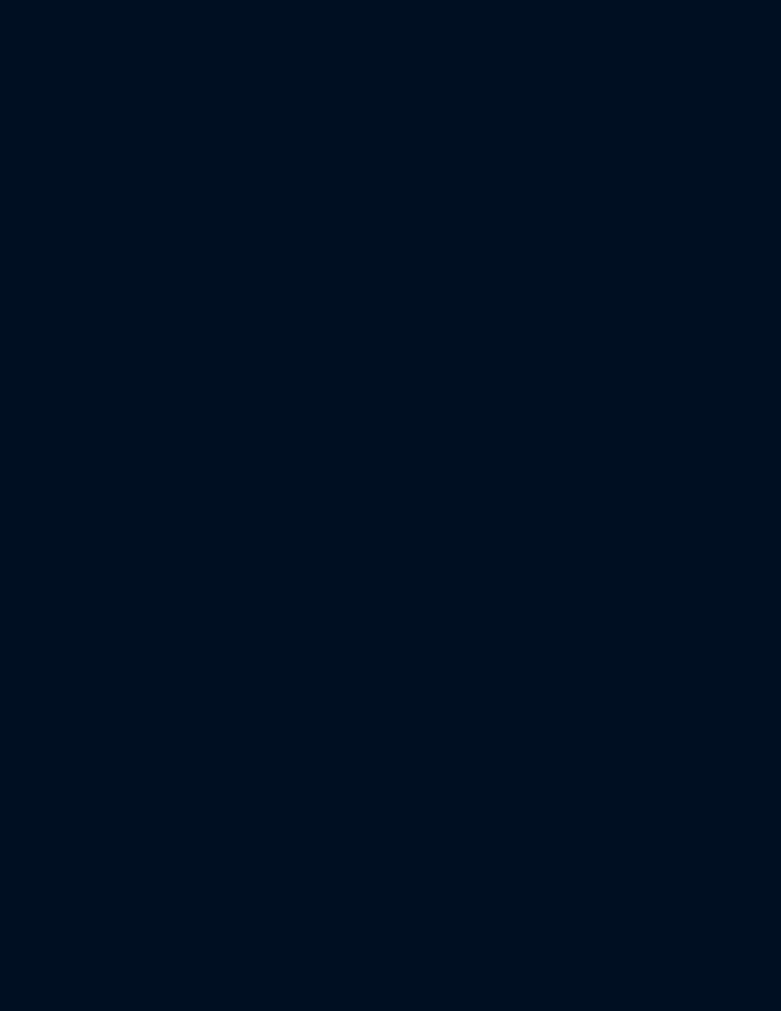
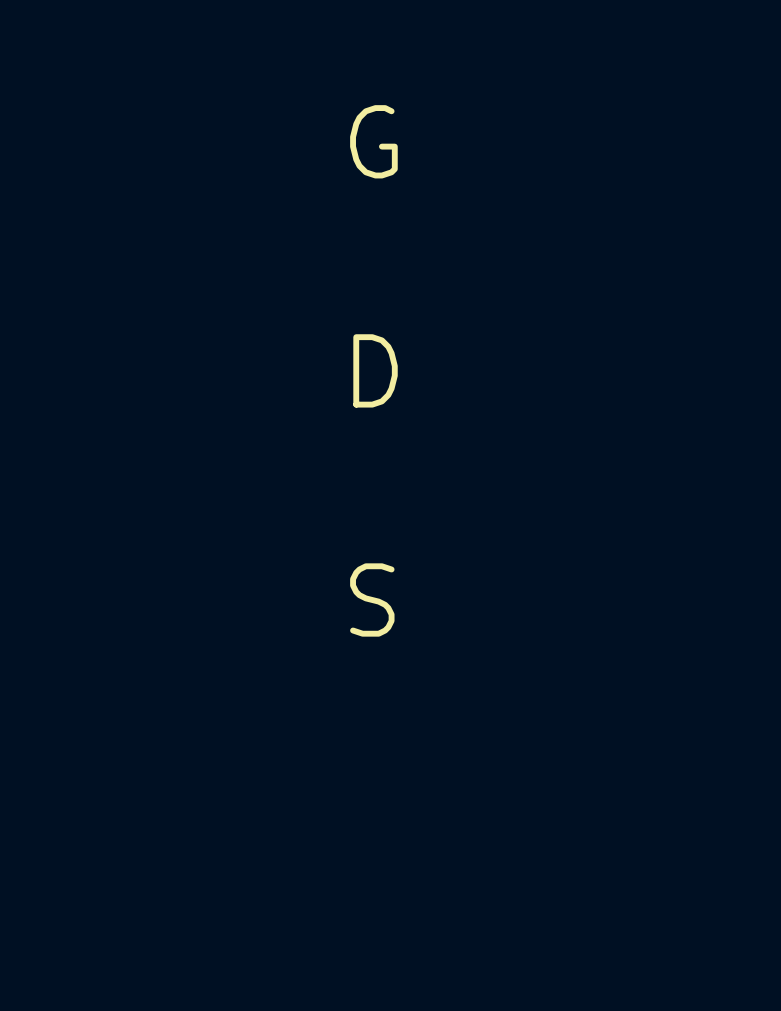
text: none -> G (373, 141)
text: none -> D (375, 370)
text: none -> S (372, 599)

